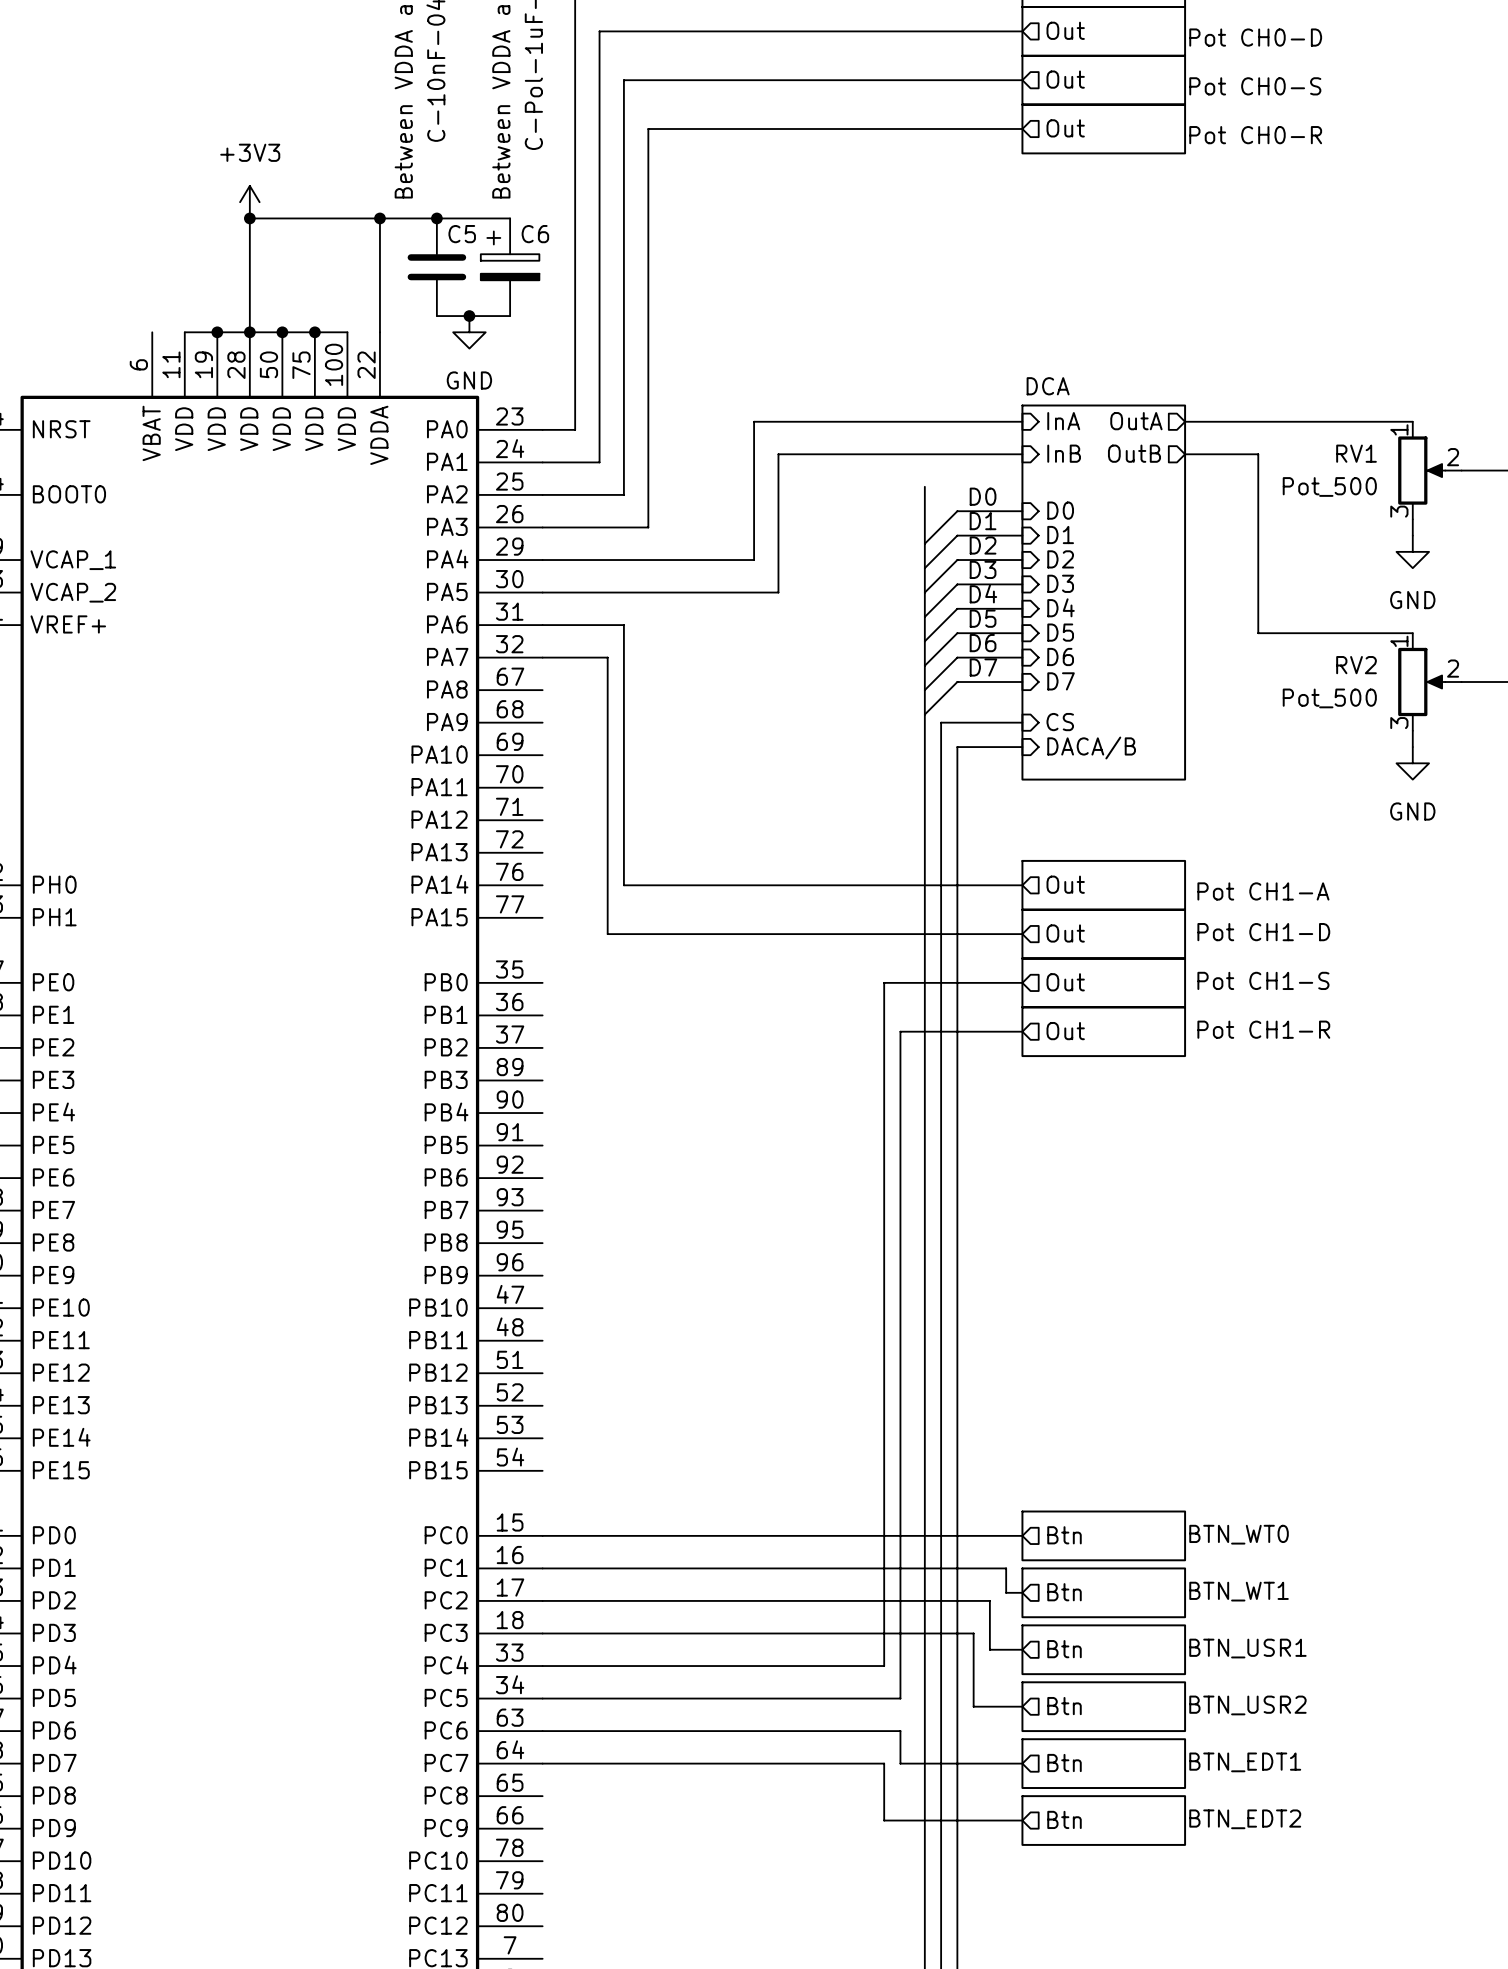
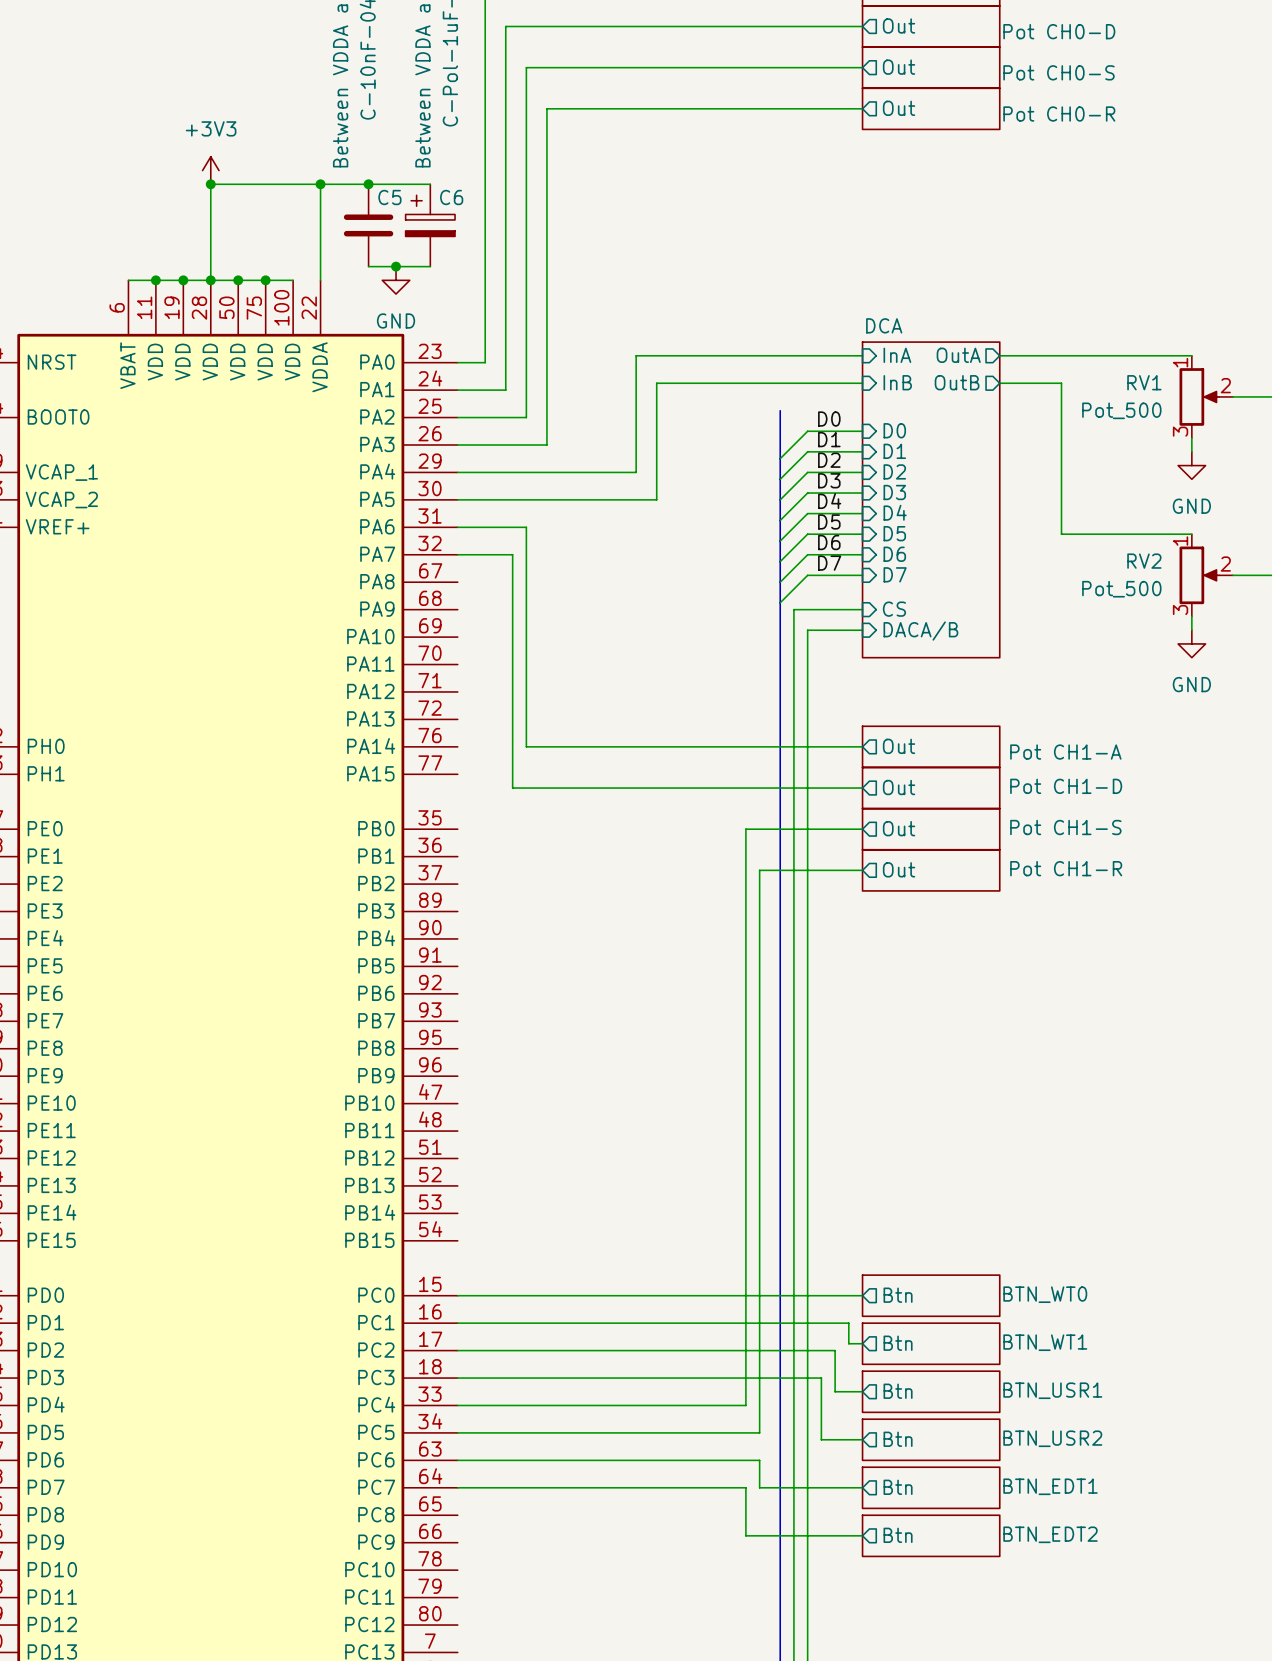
wire: none -> (128, 280) (155, 280)
junction: none -> (155, 280)

